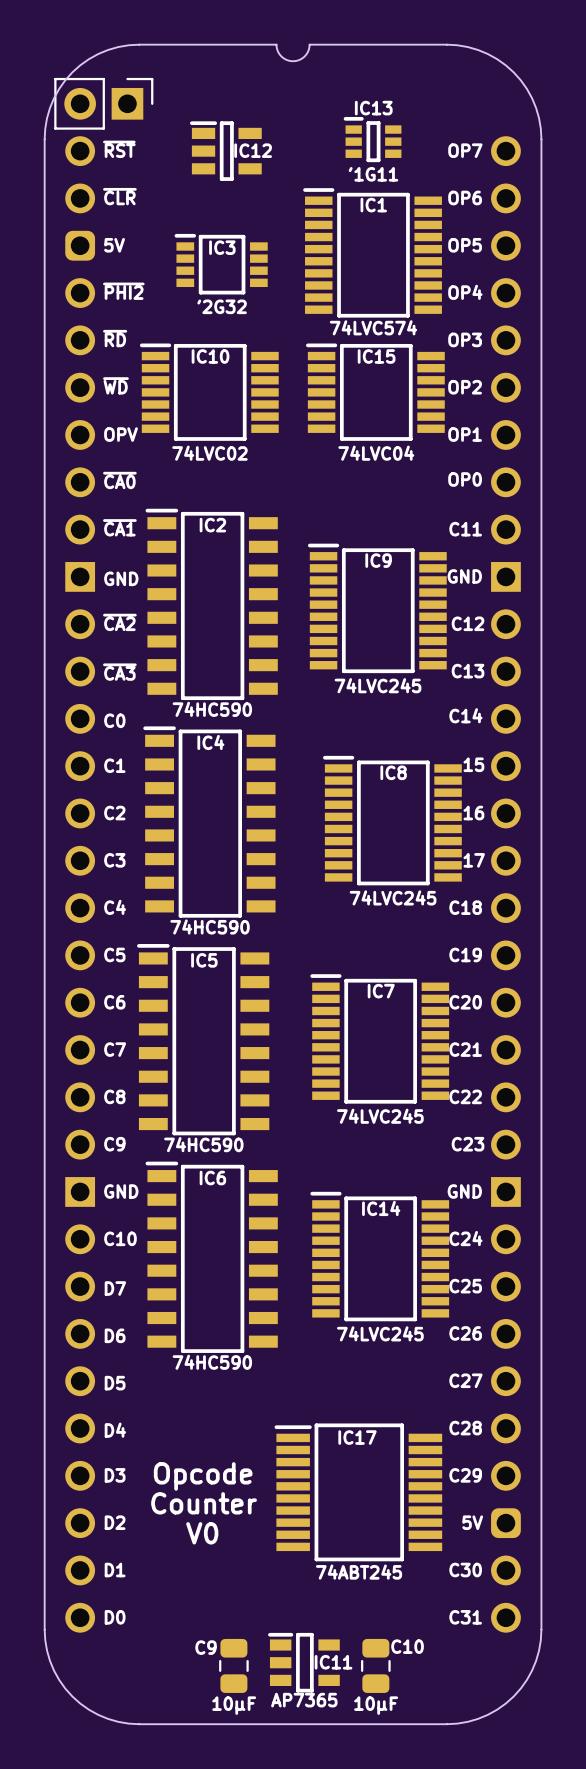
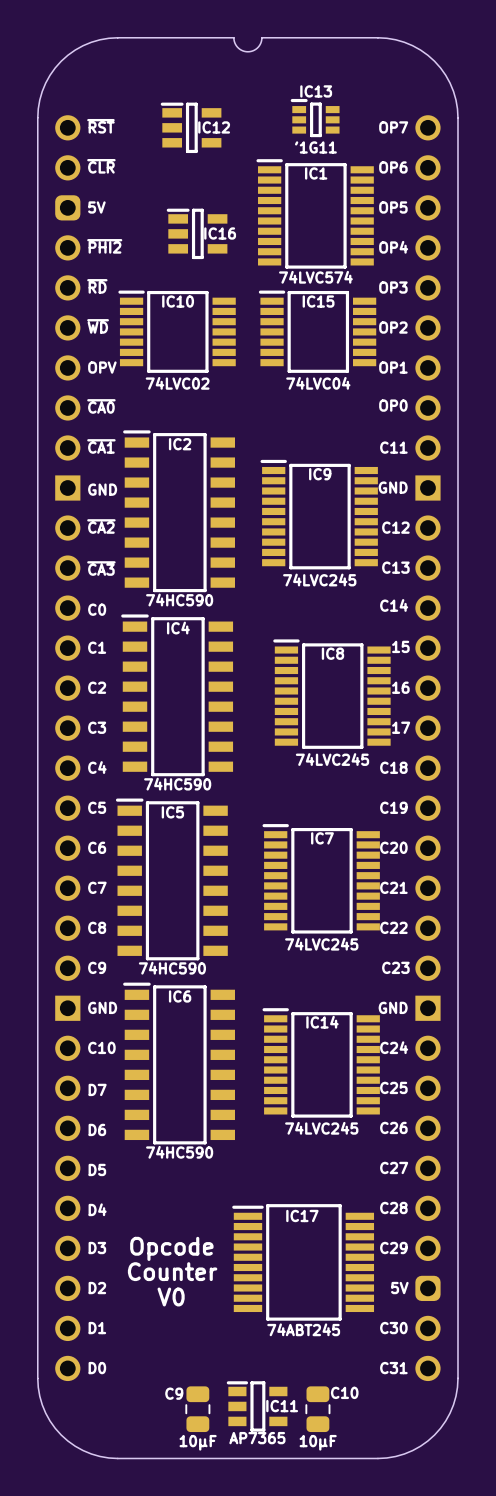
part: (103, 103) -> none
IC3: (221, 264) -> none
IC16: none -> (197, 233)

